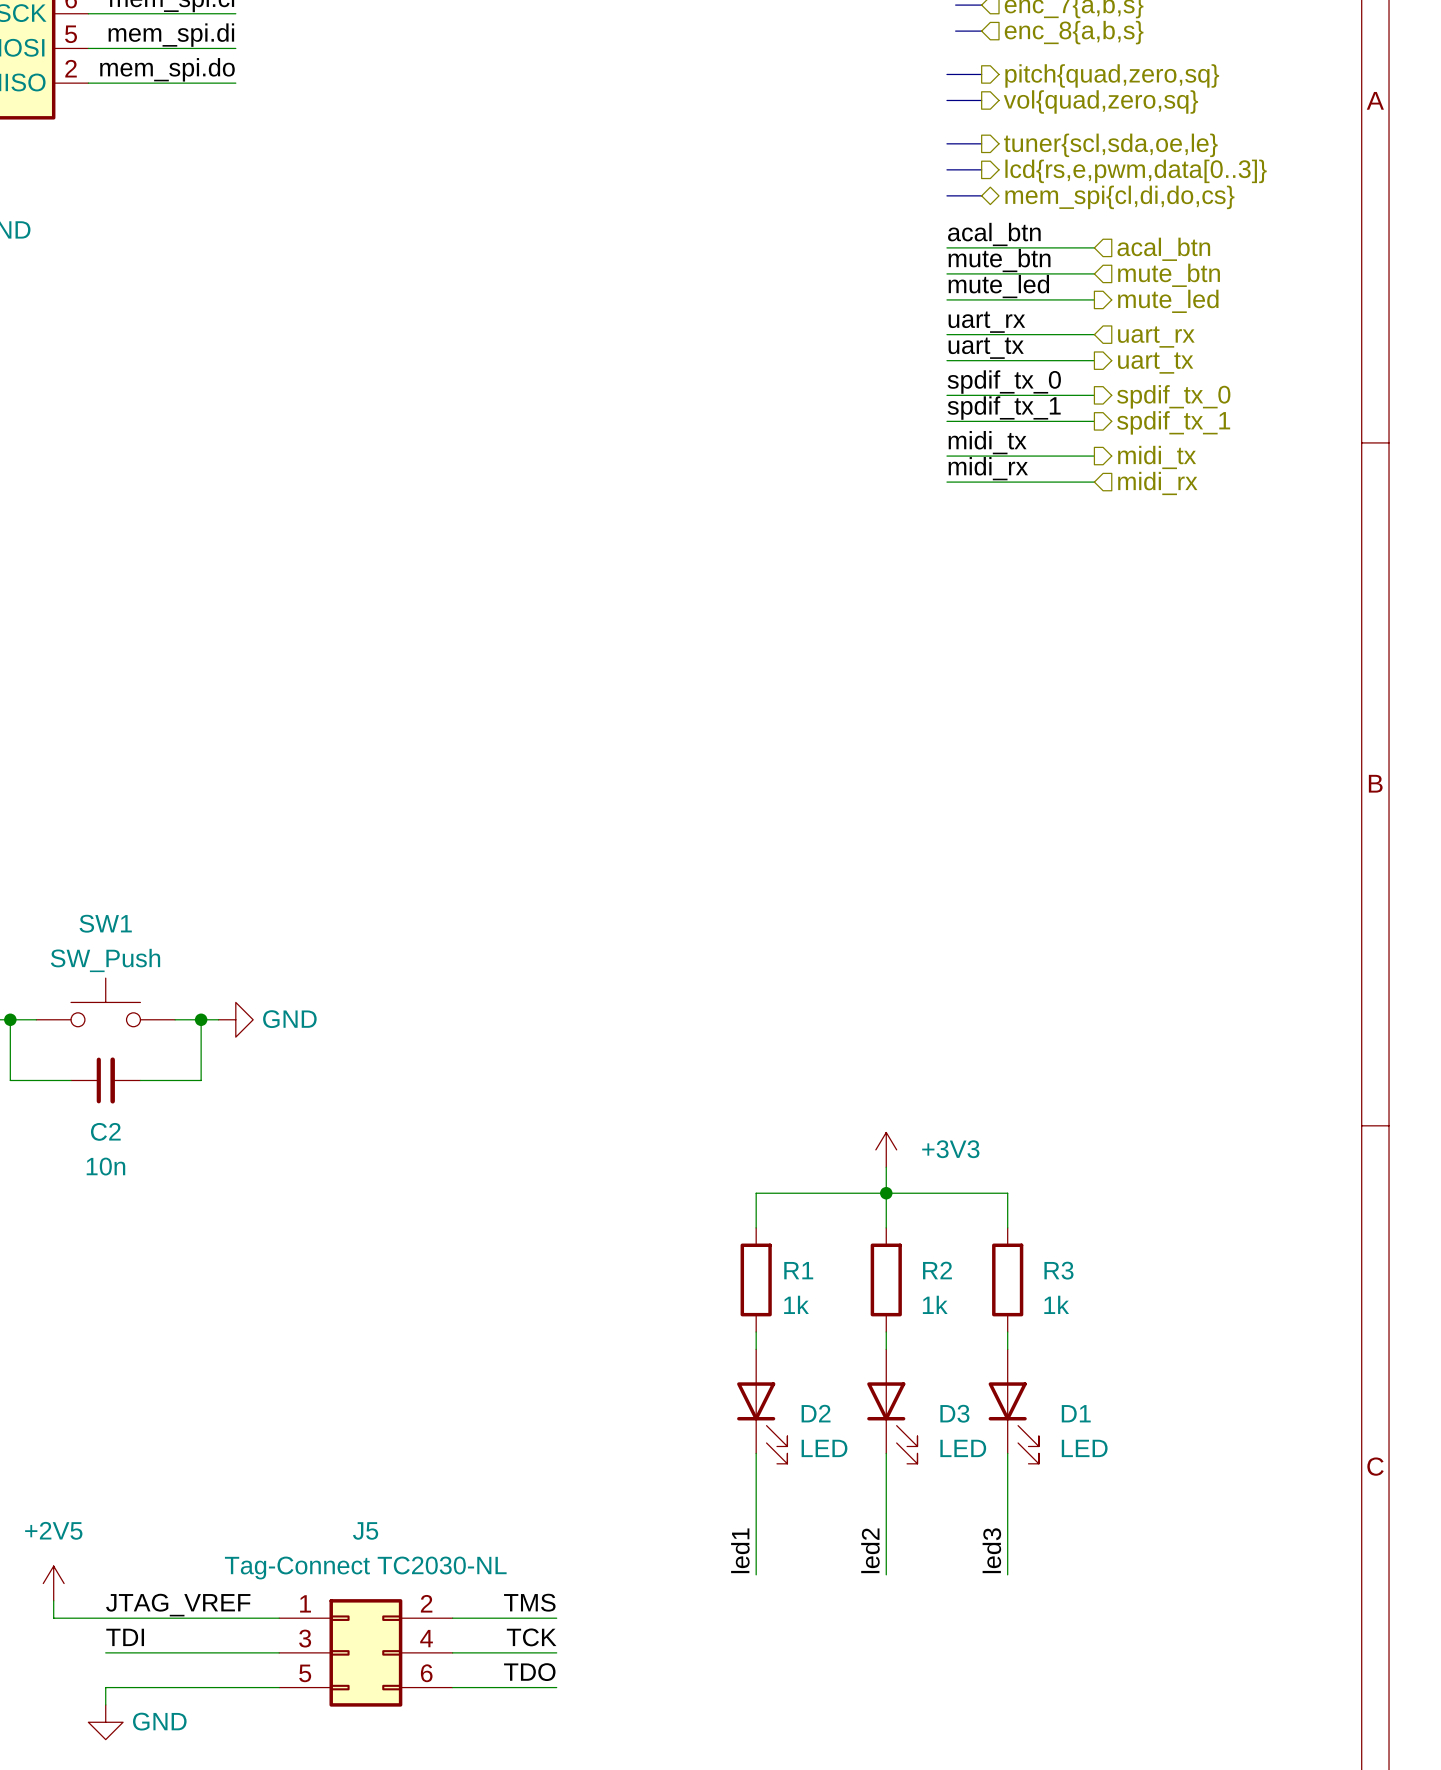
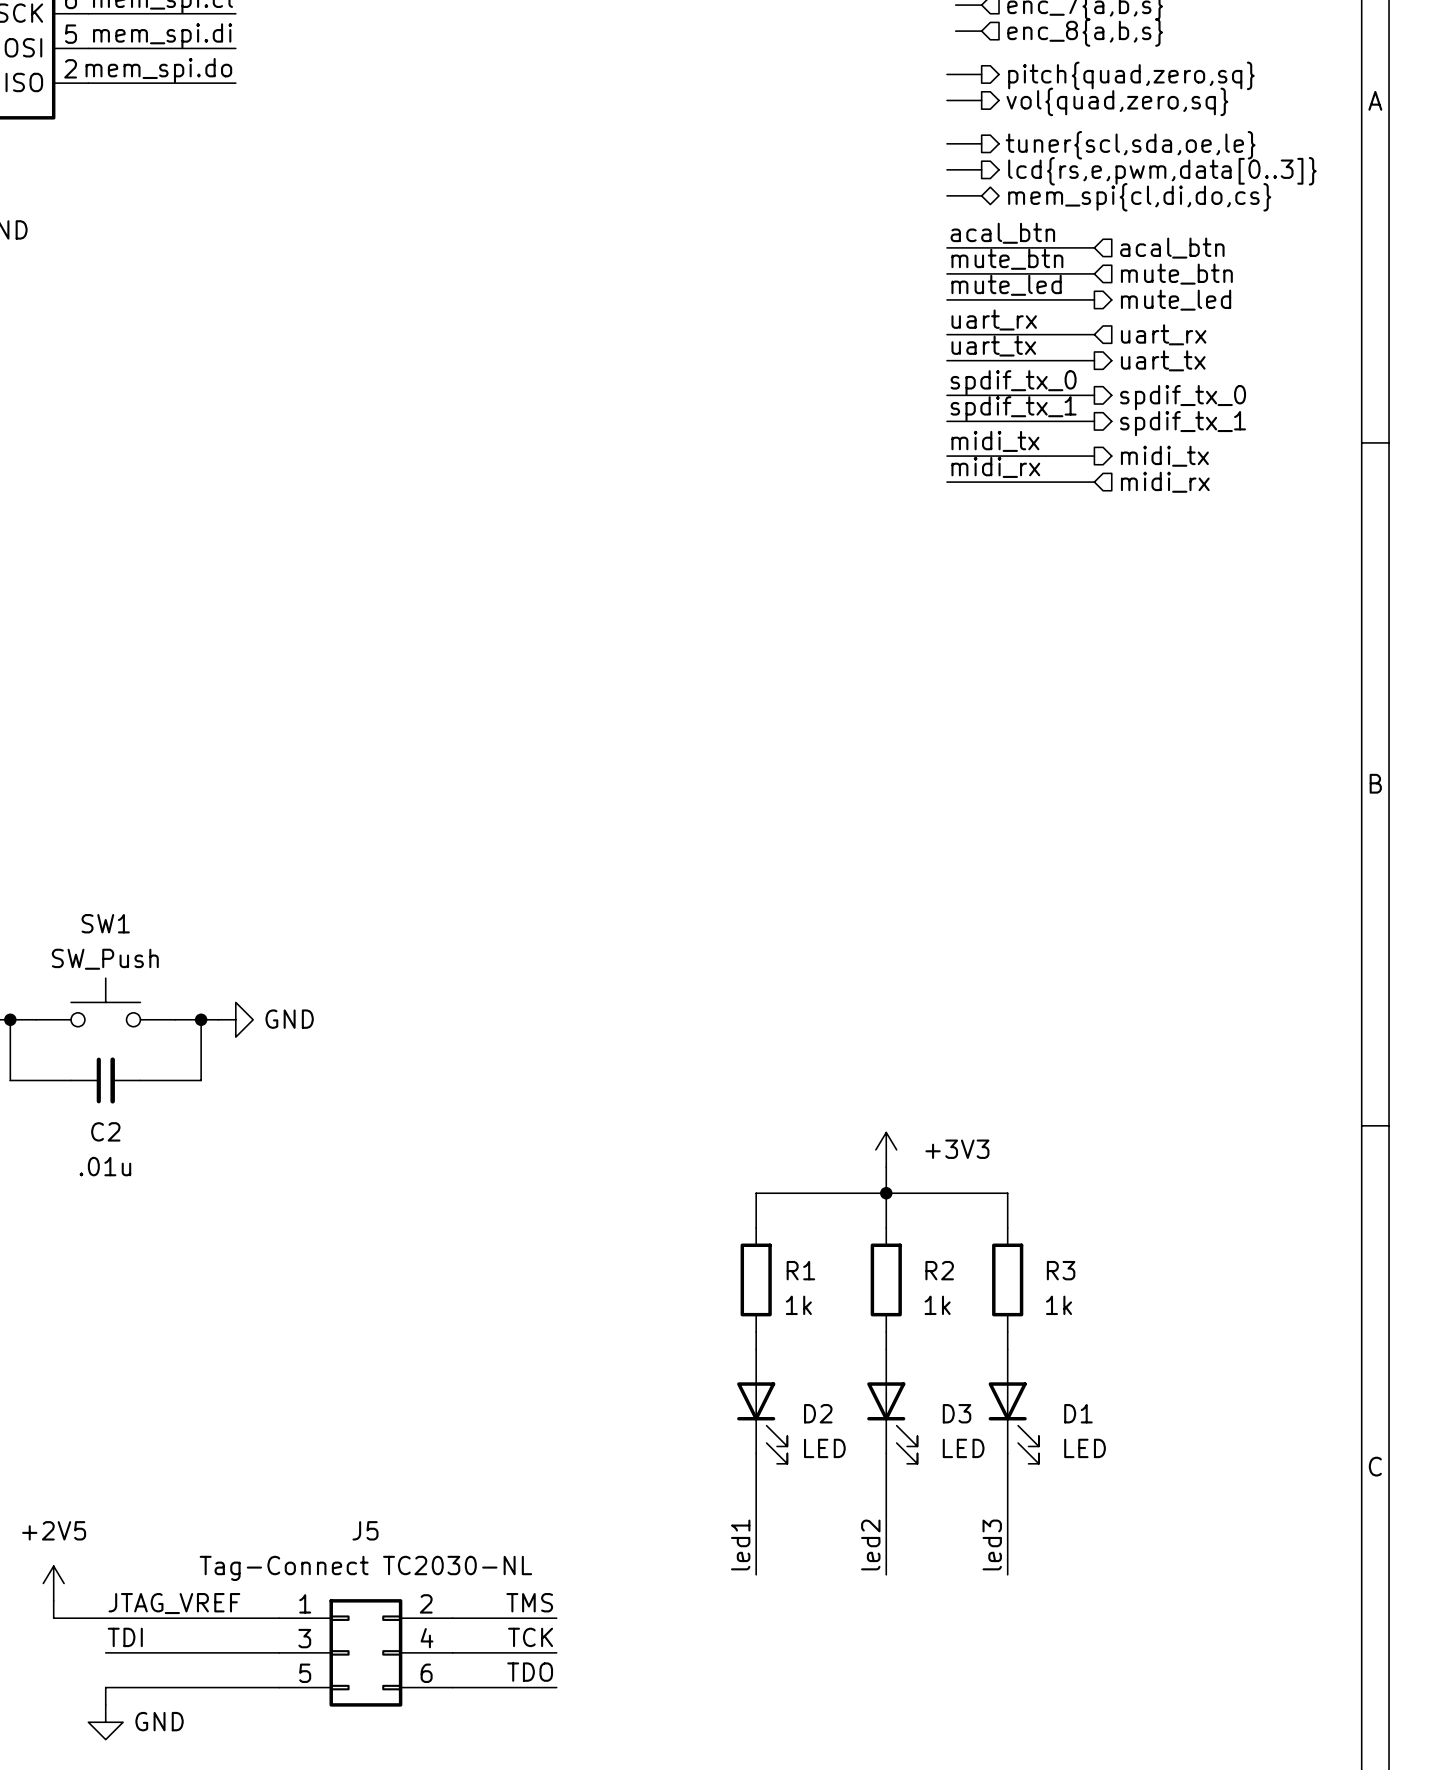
C2 value: 10n (105, 1166) -> .01u (105, 1166)

